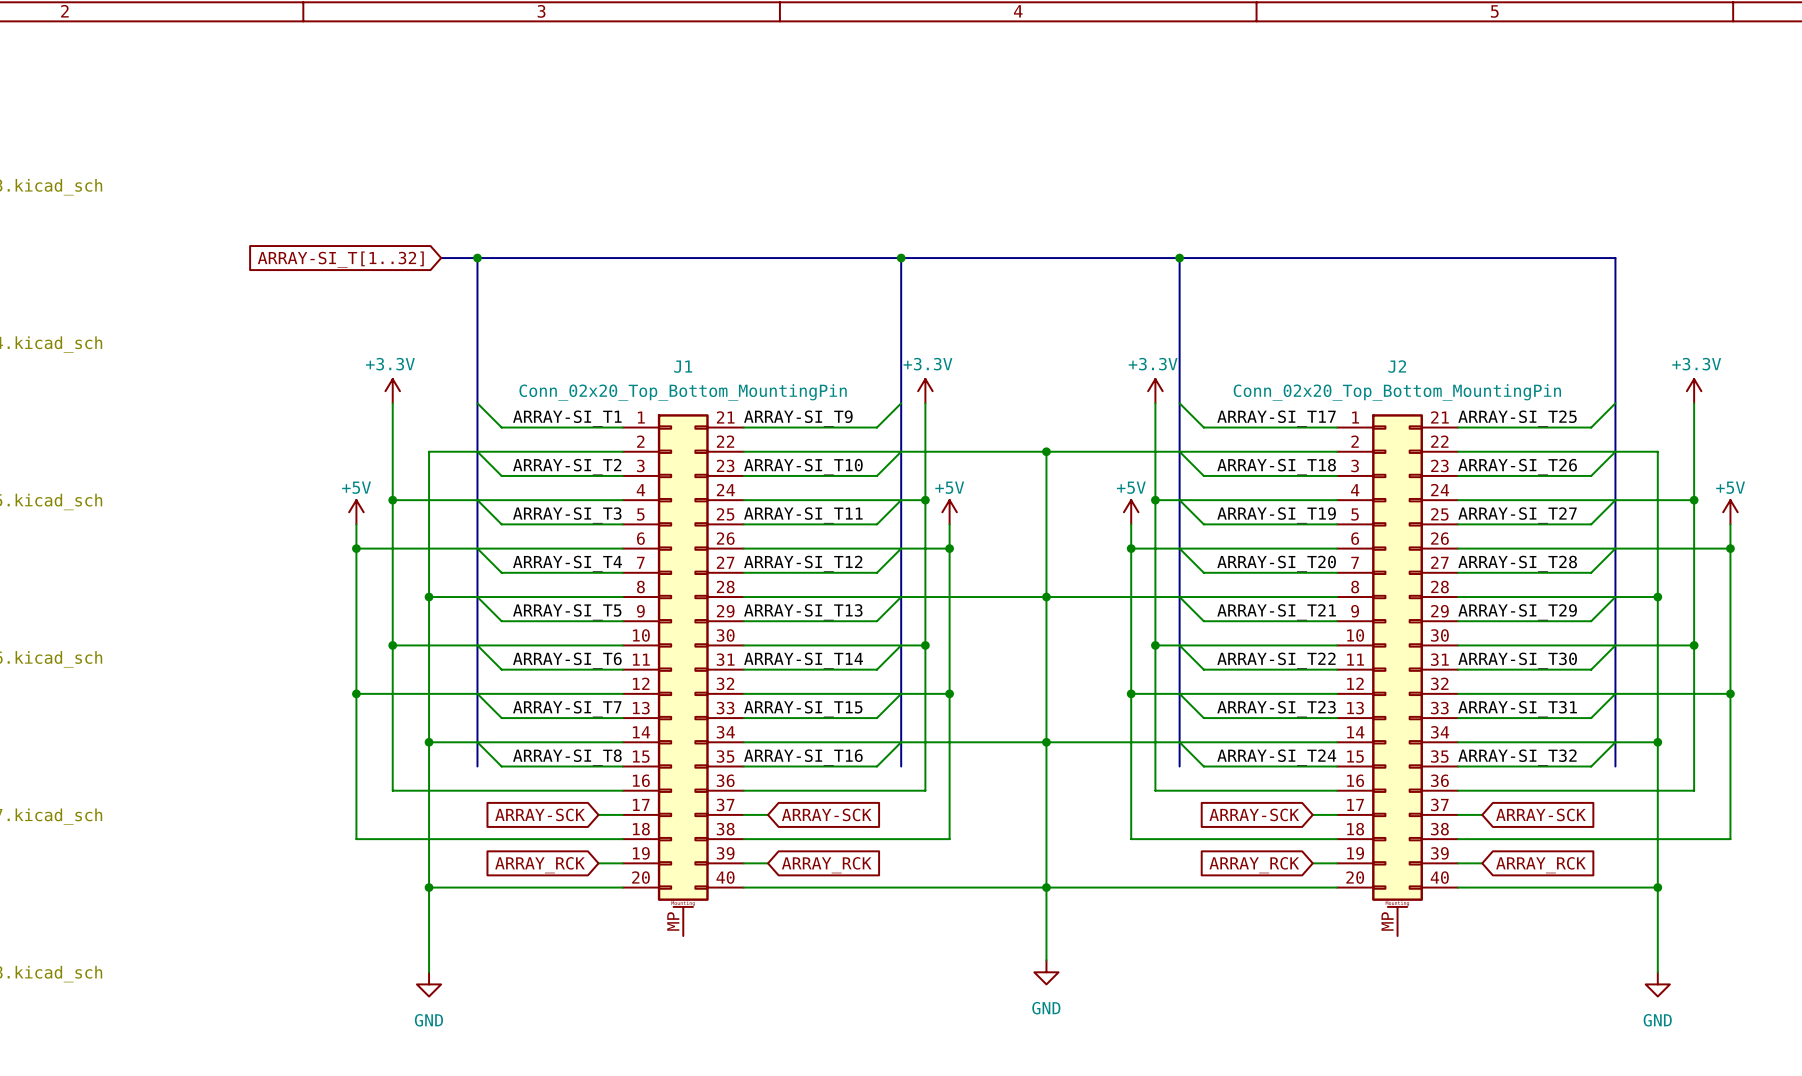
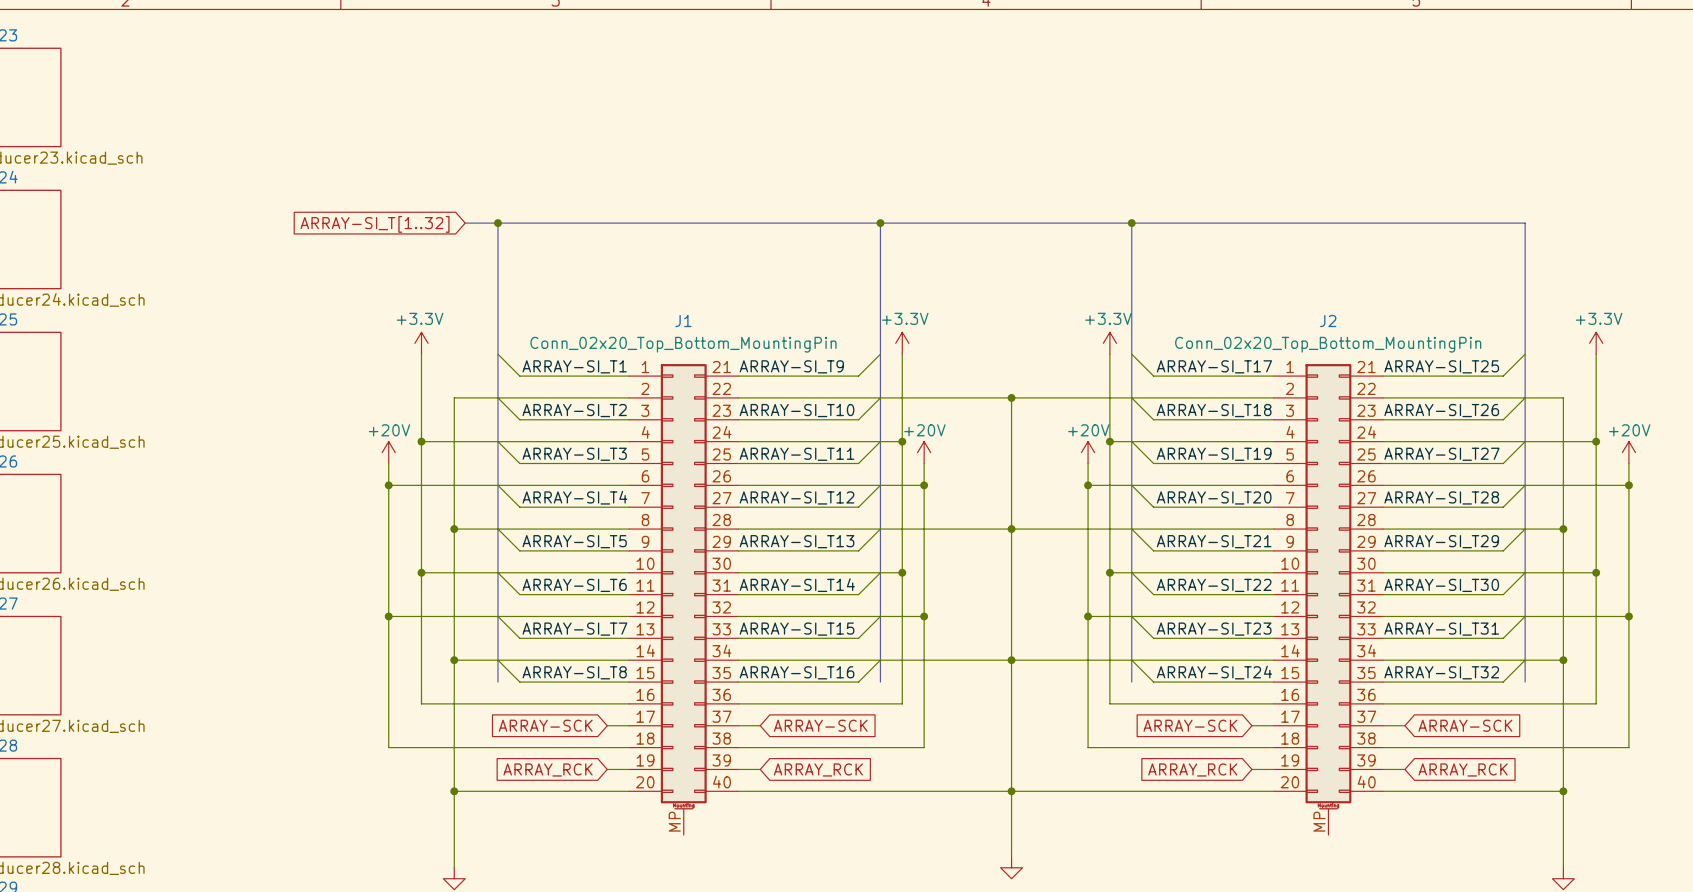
power symbol: +5V (356, 512) -> +20V (388, 452)
power symbol: +5V (949, 512) -> +20V (924, 452)
power symbol: +5V (1131, 512) -> +20V (1088, 452)
power symbol: +5V (1730, 512) -> +20V (1628, 452)

